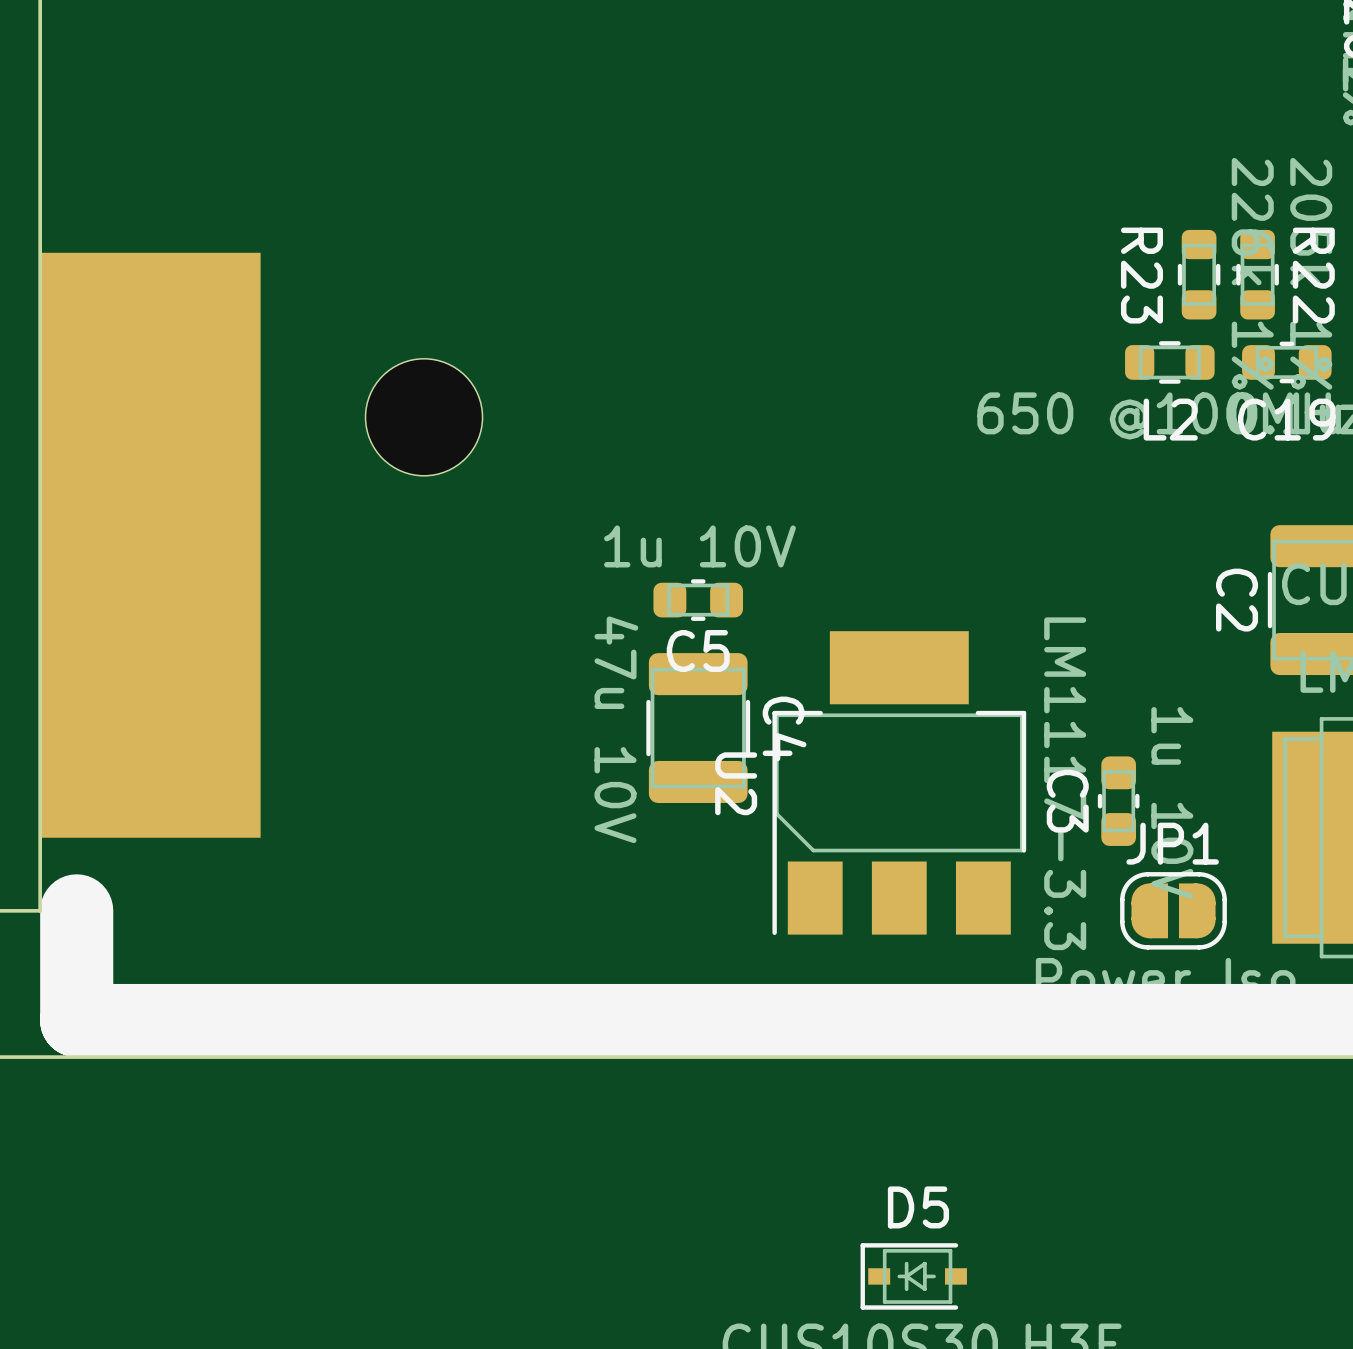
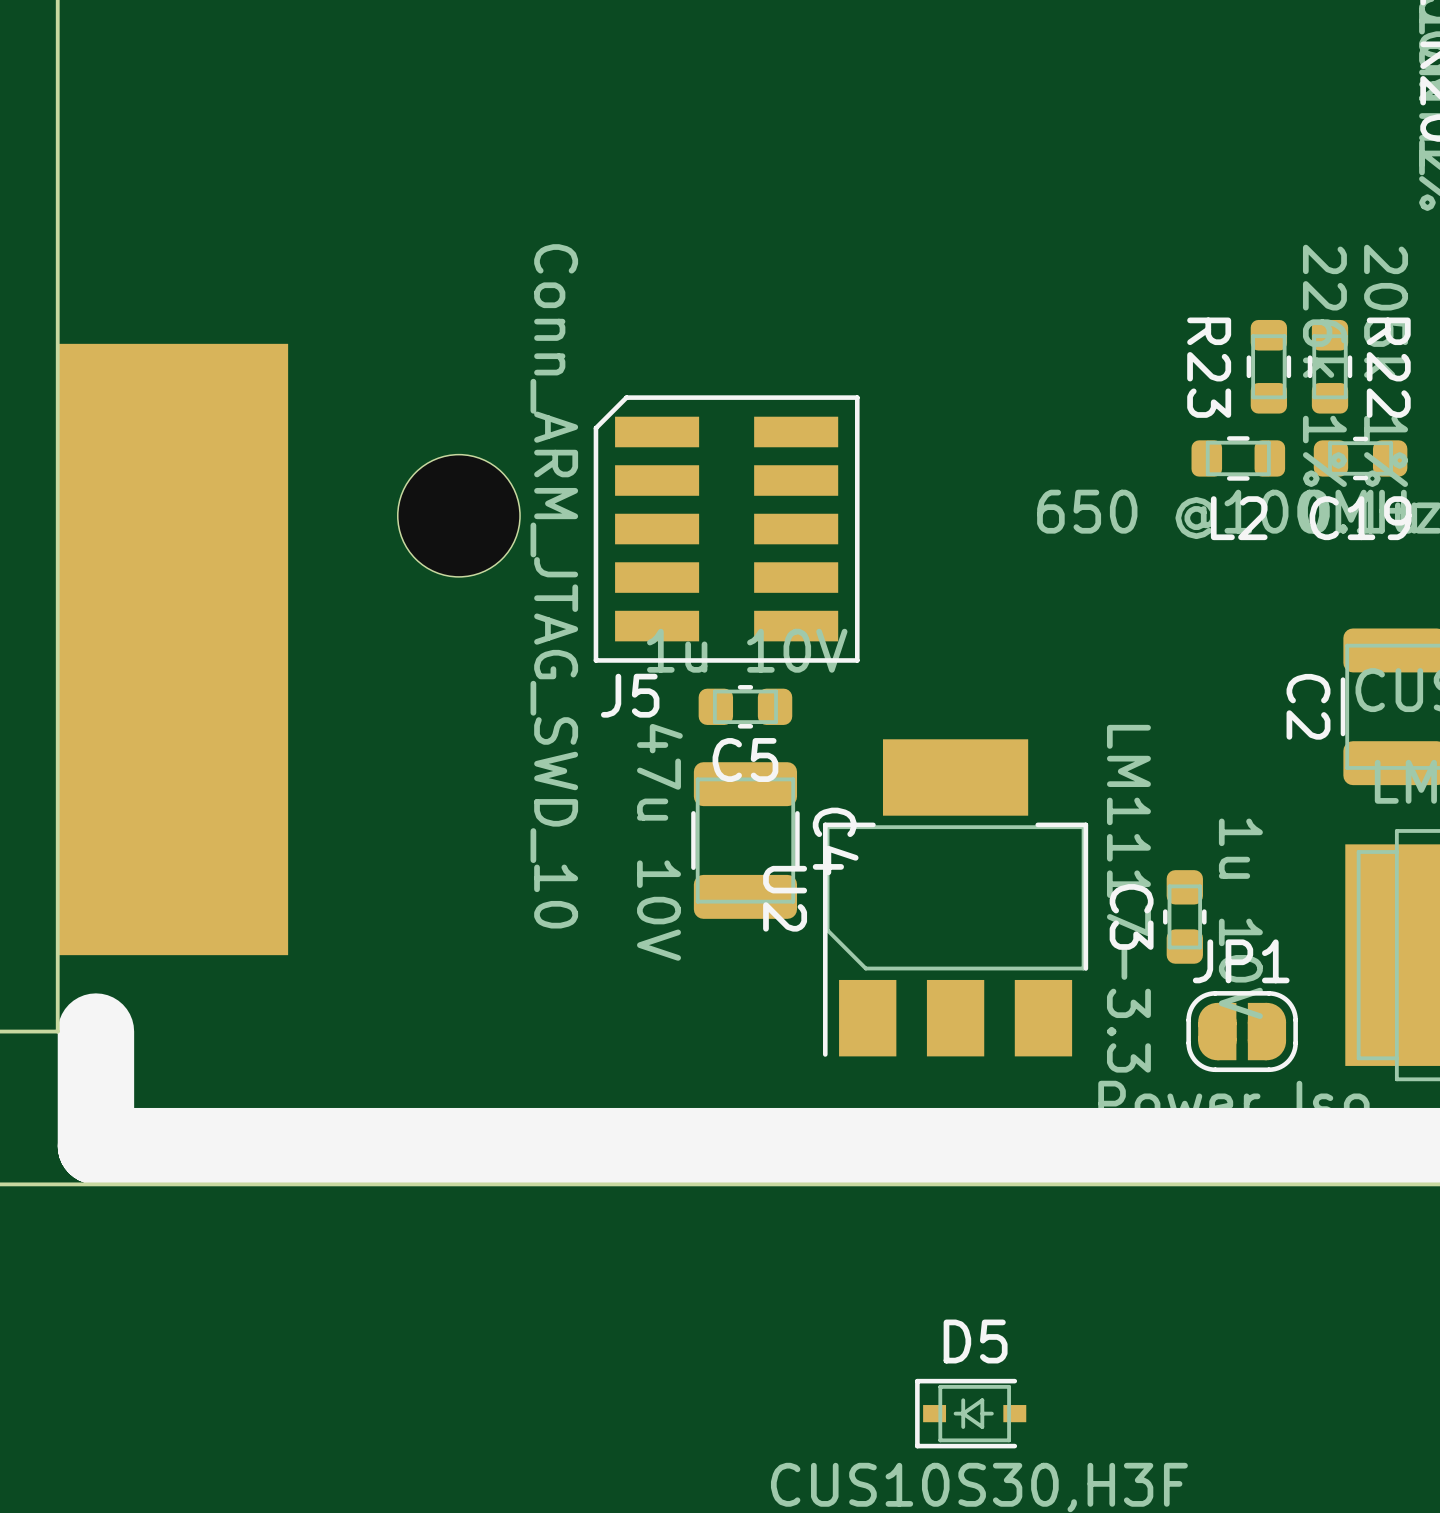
J5: none -> Conn_ARM_JTAG_SWD_10 (726, 529)

